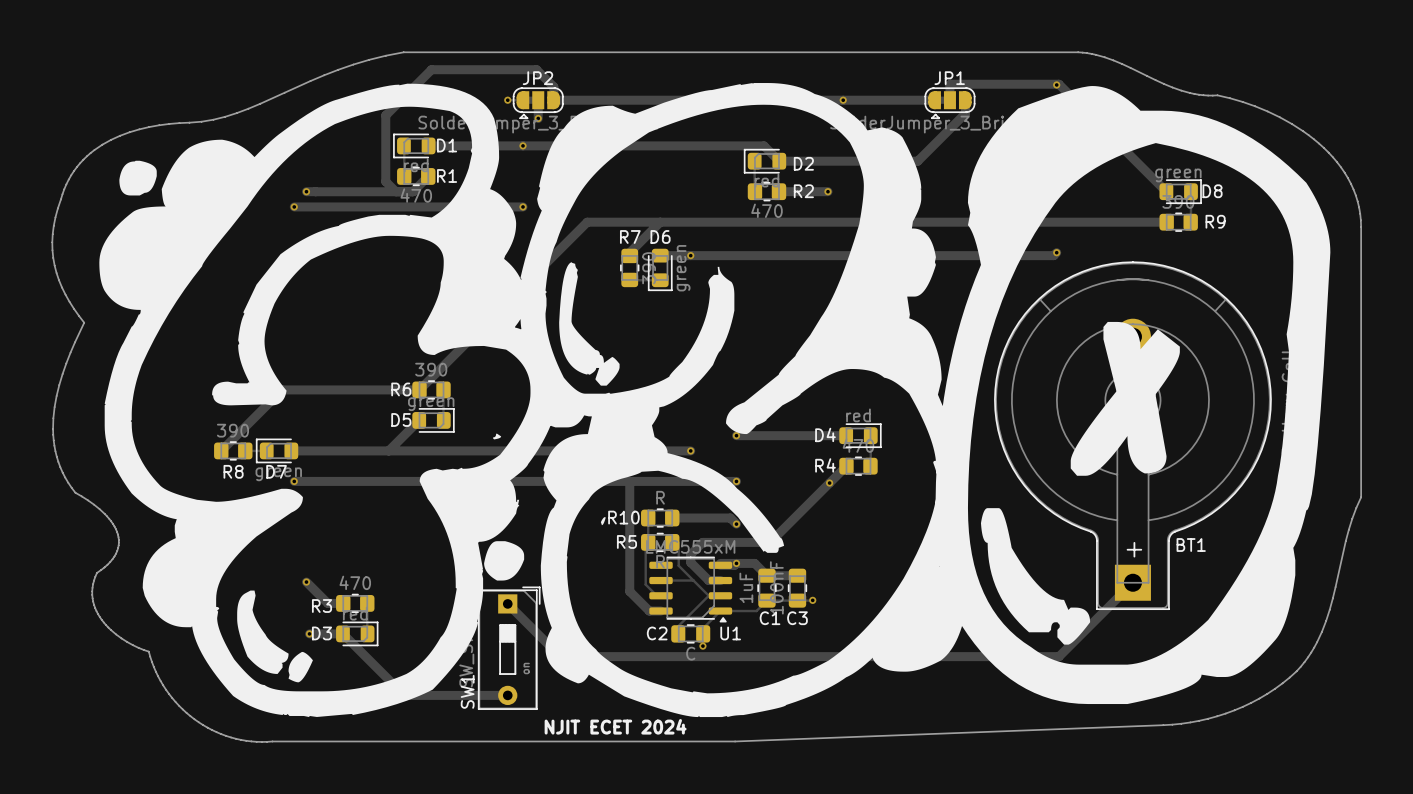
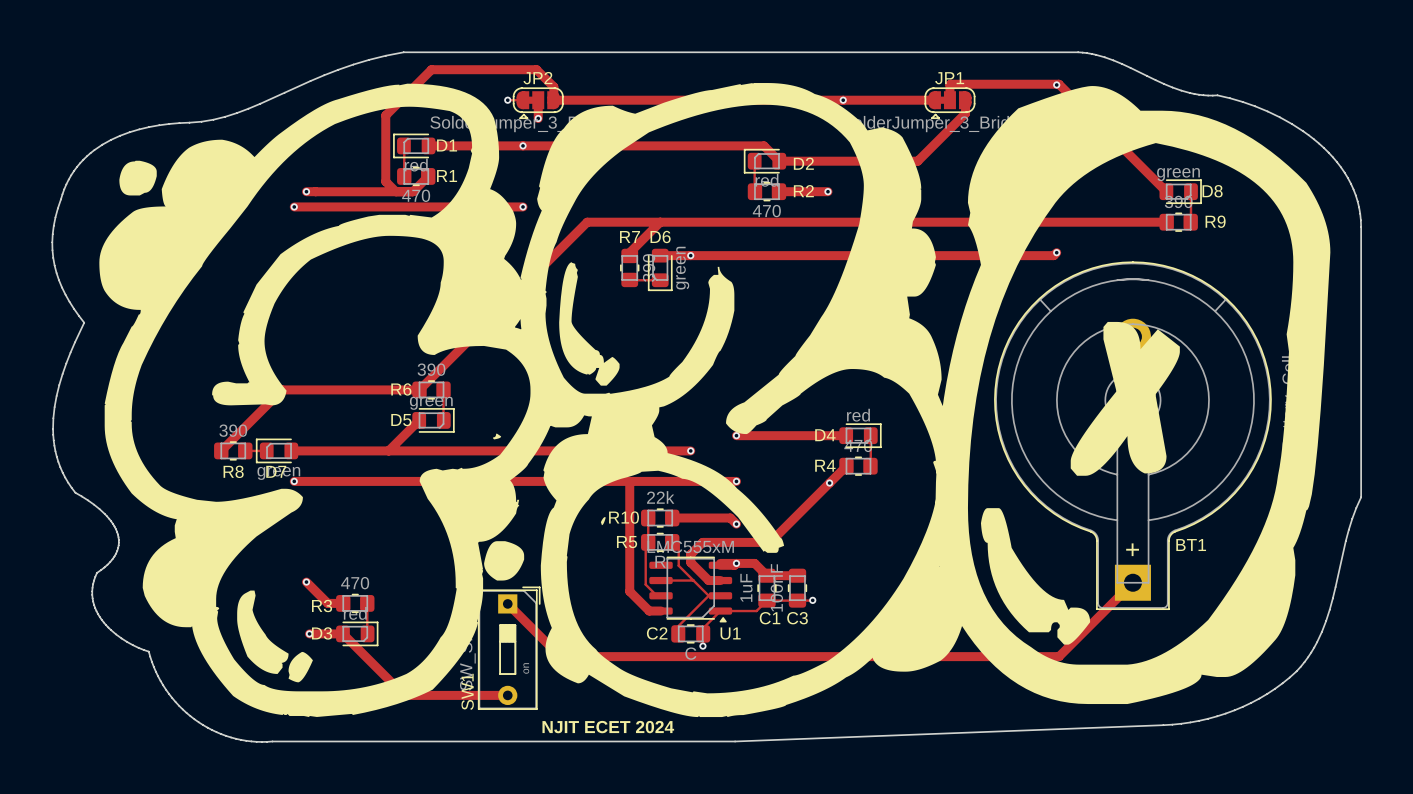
R10 value: R (660, 497) -> 22k (660, 497)

